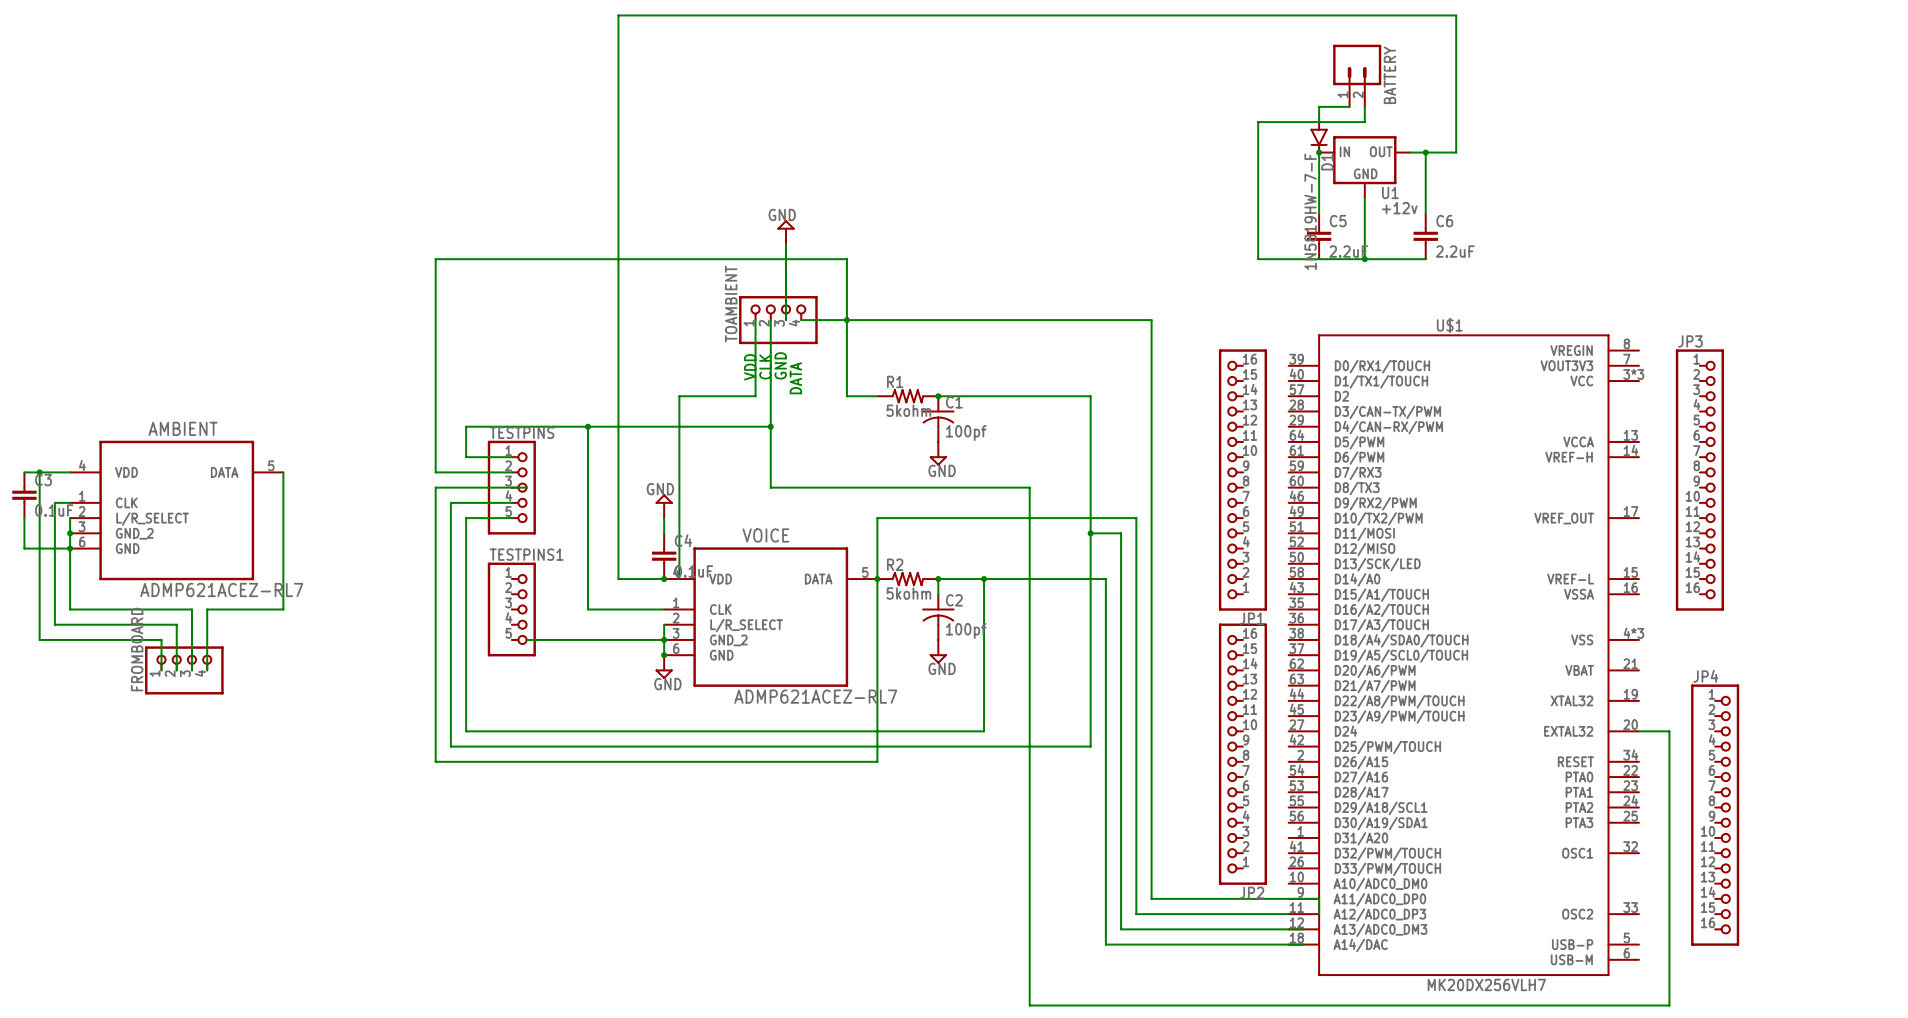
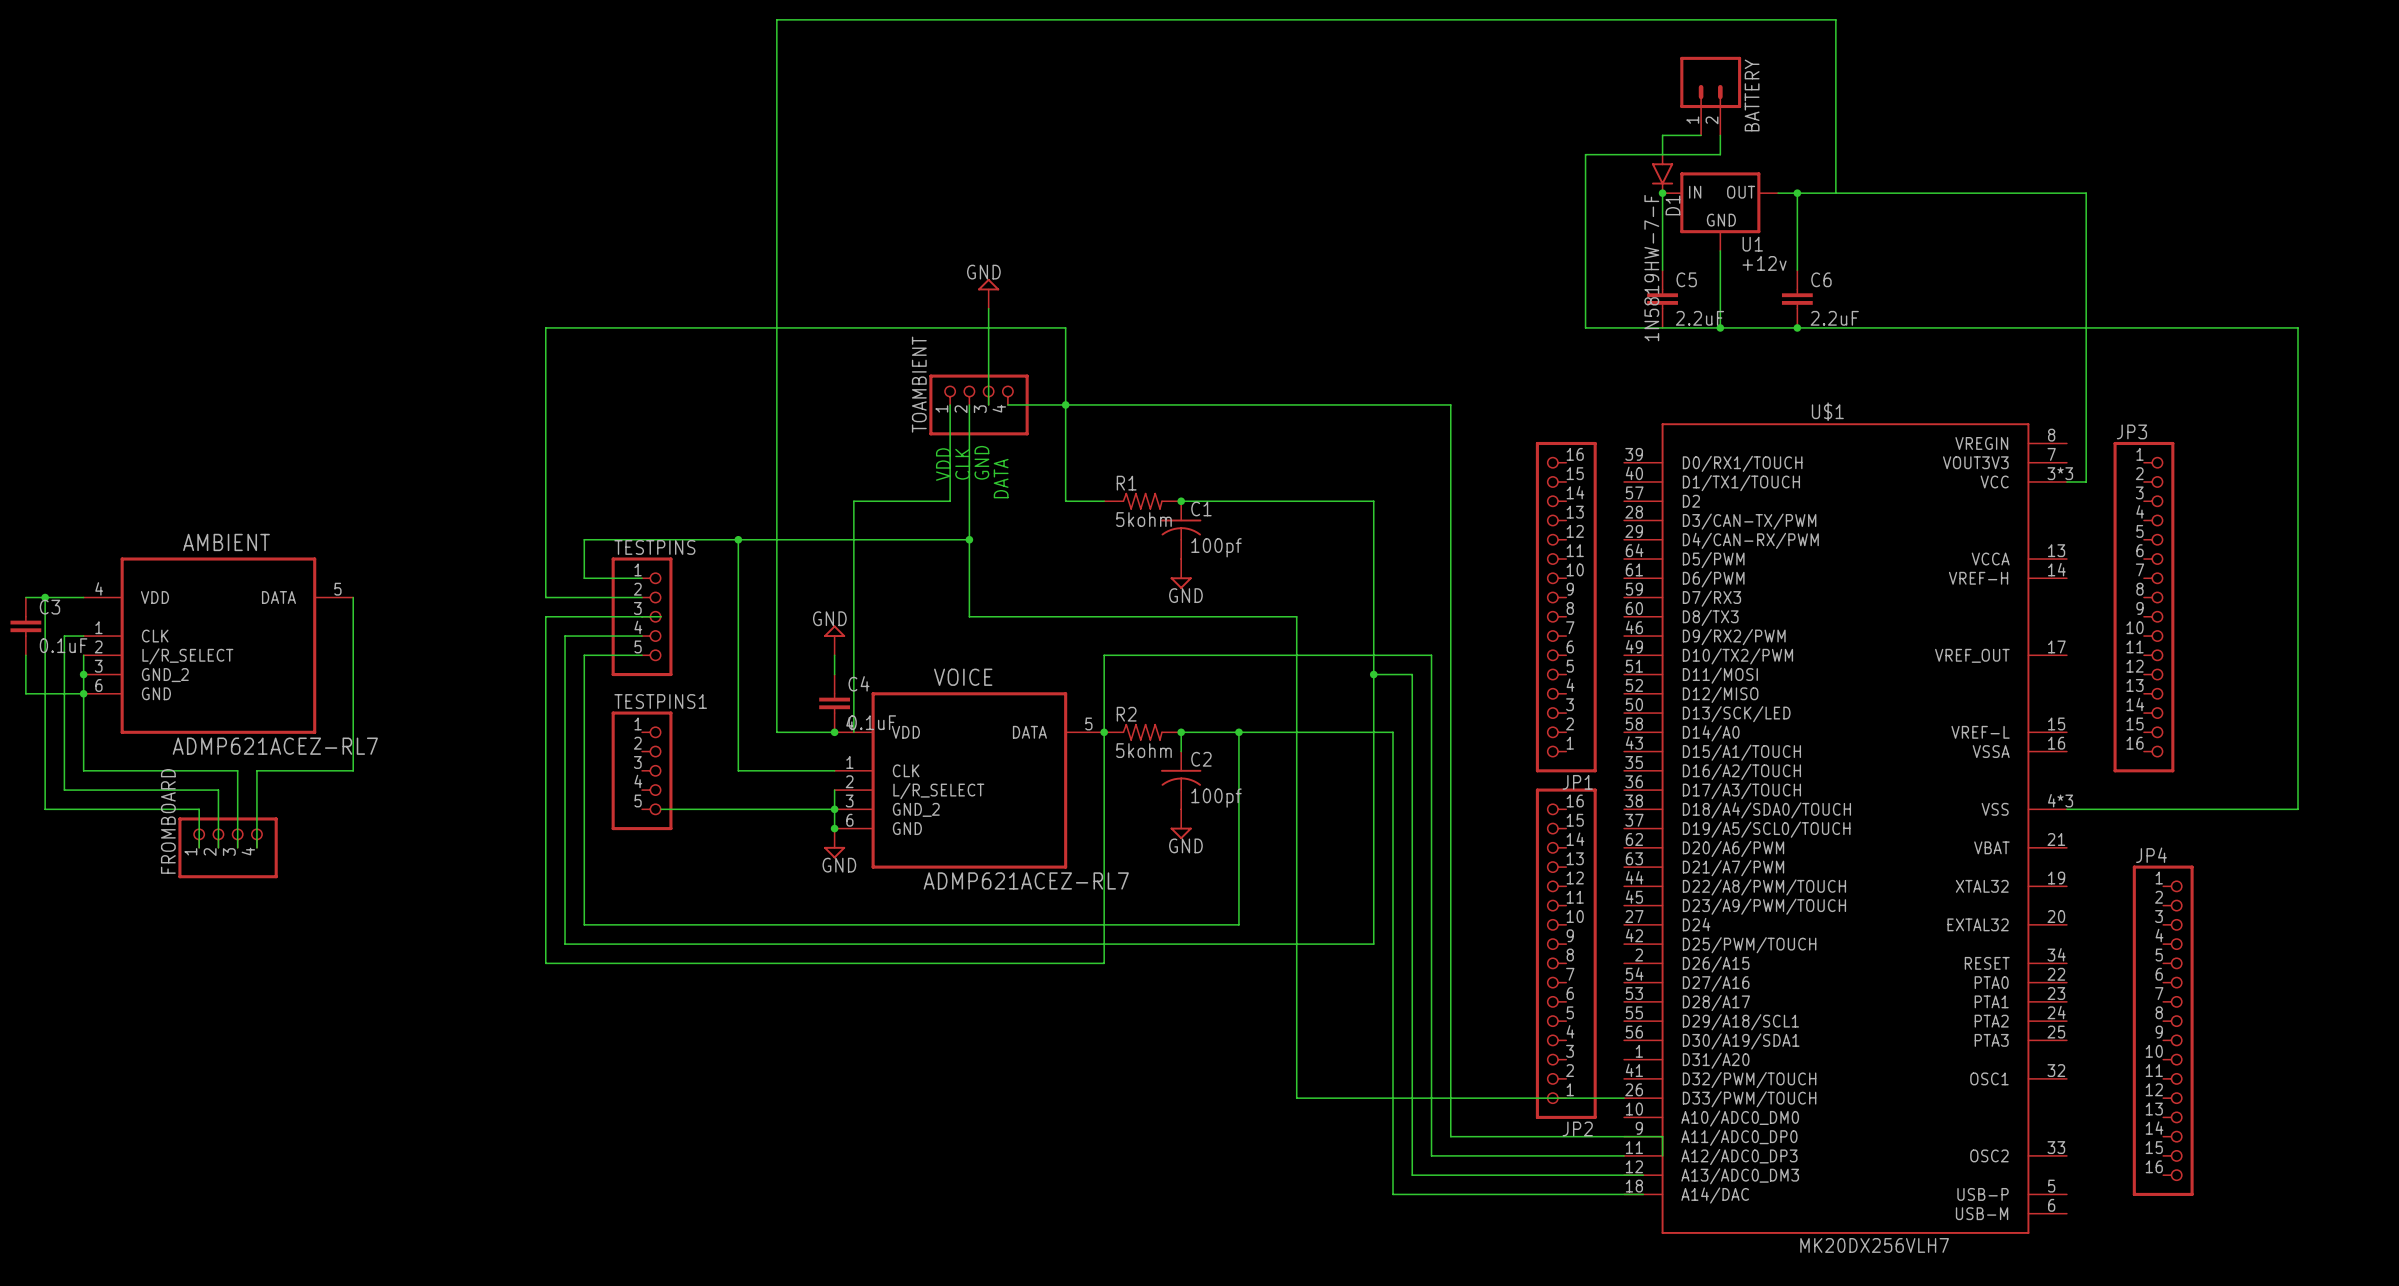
wire: none -> (1835, 193) (2086, 193) (2086, 481) (2066, 481)
wire: none -> (1797, 327) (2297, 327) (2297, 809) (2066, 809)
junction: none -> (1797, 327)
wire: (1638, 731) (1669, 731) (1669, 1005) (1029, 1005) (1029, 868) -> (1624, 1098) (1296, 1098)

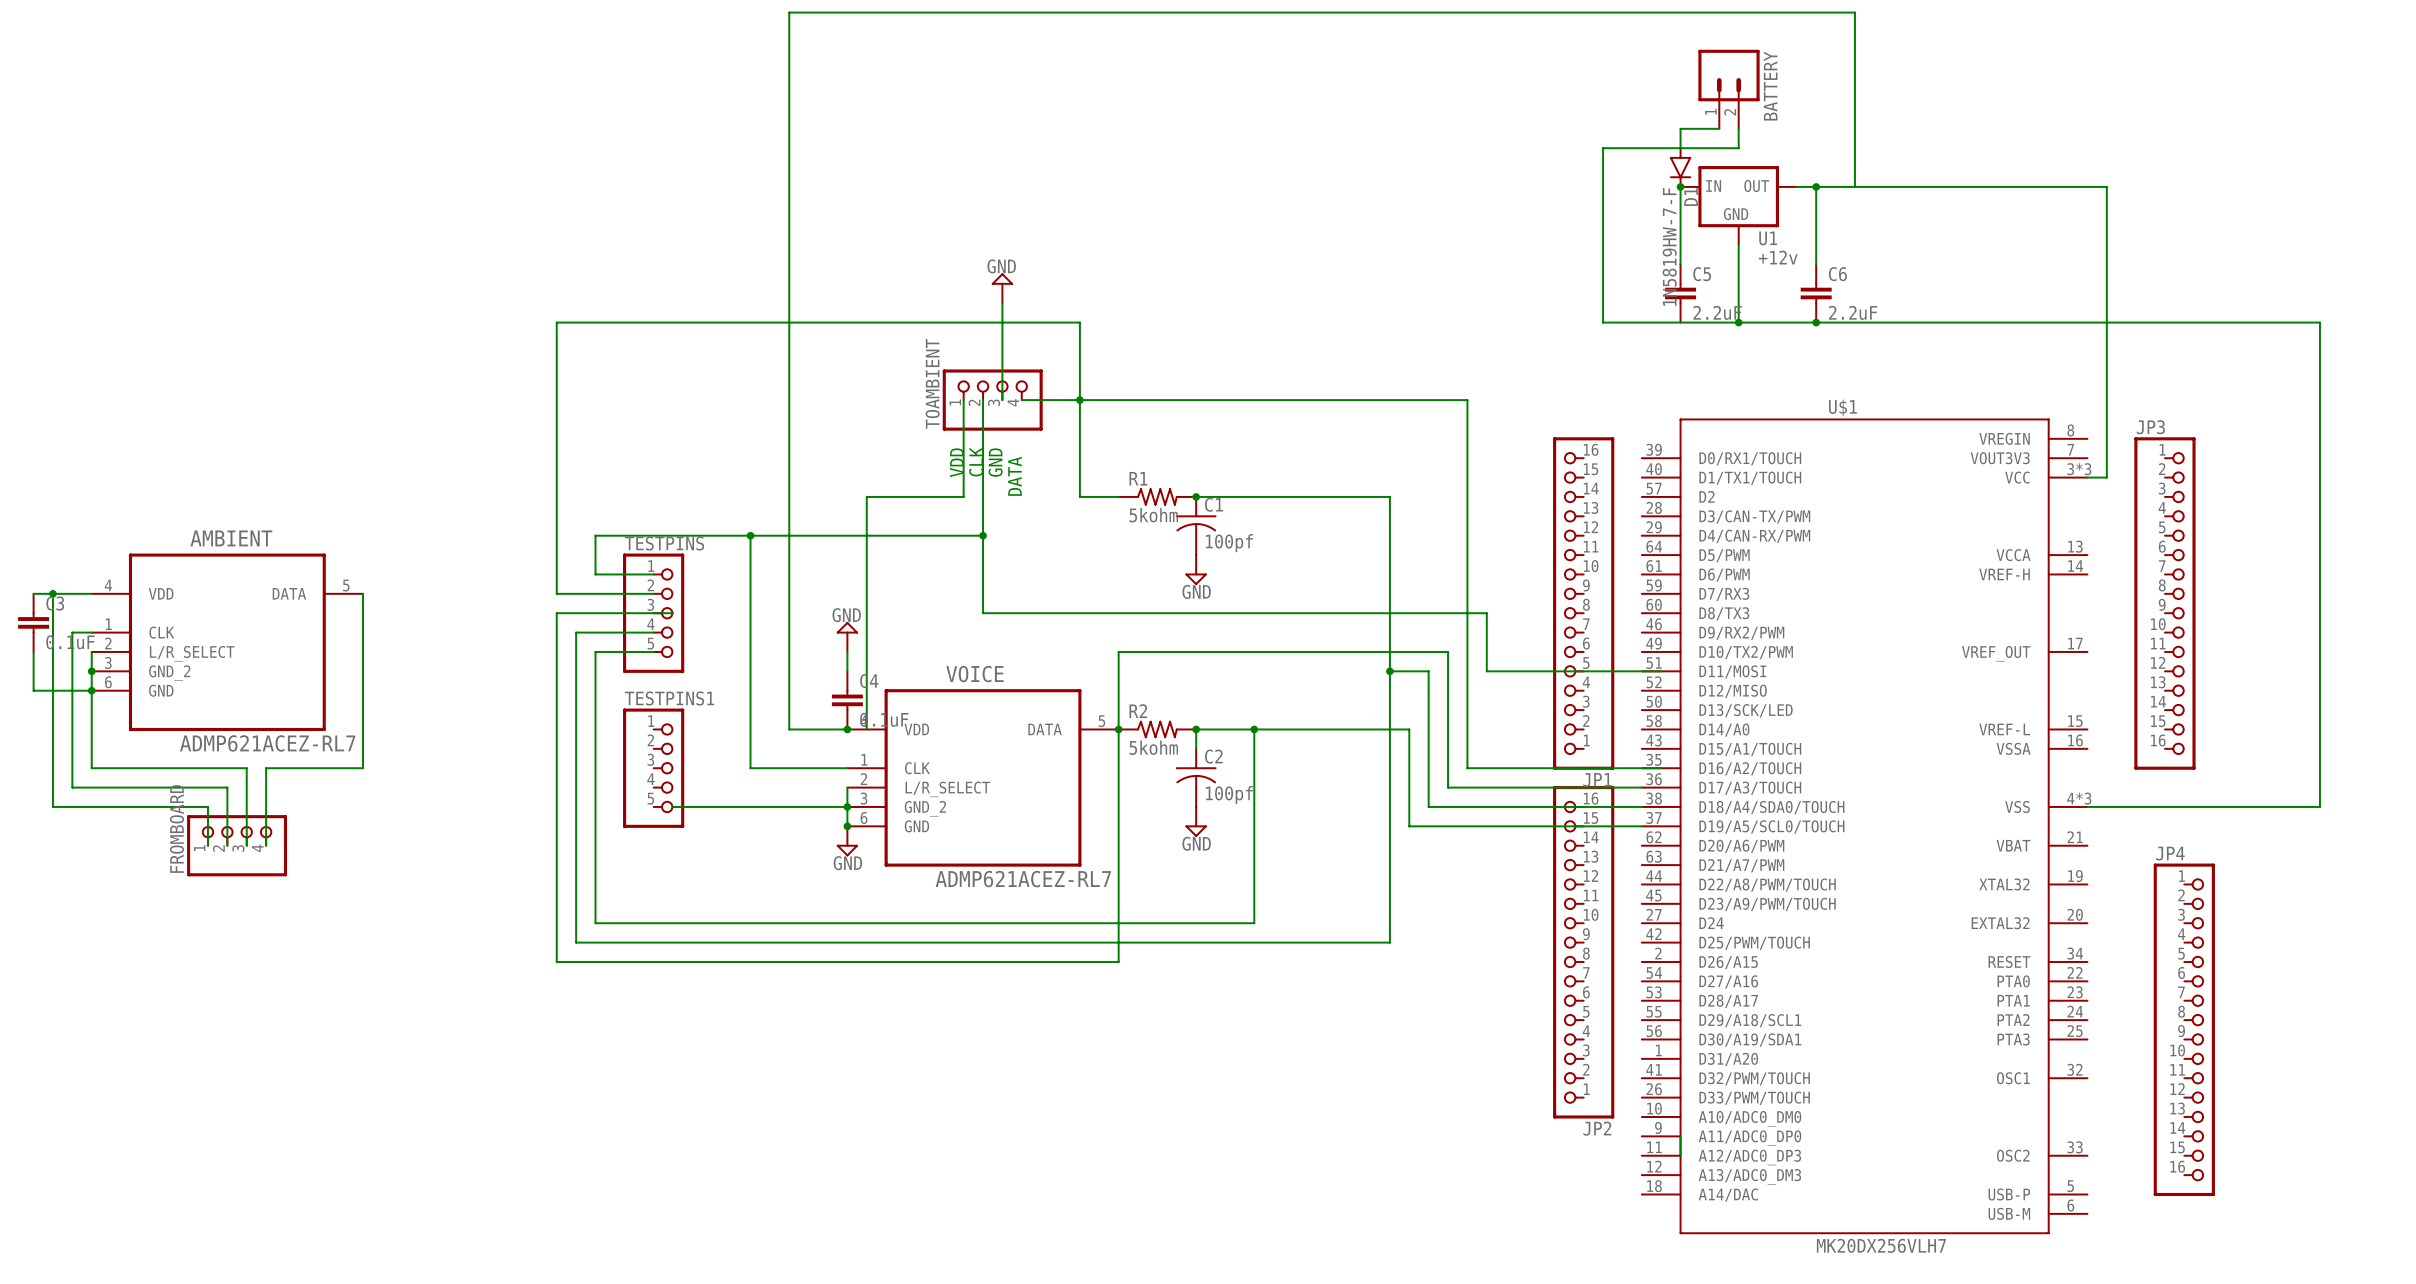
wire: (1296, 616) (1296, 1098) (1624, 1098) -> (1312, 613) (1486, 613) (1486, 671) (1661, 671)
wire: (1450, 770) (1450, 1136) (1662, 1136) -> (1467, 768) (1661, 768)
wire: (1431, 790) (1431, 1155) (1624, 1155) -> (1448, 787) (1641, 787)
wire: (1412, 809) (1412, 1175) (1643, 1175) -> (1428, 806) (1641, 806)
wire: (1393, 828) (1393, 1194) (1643, 1194) -> (1409, 826) (1641, 826)

